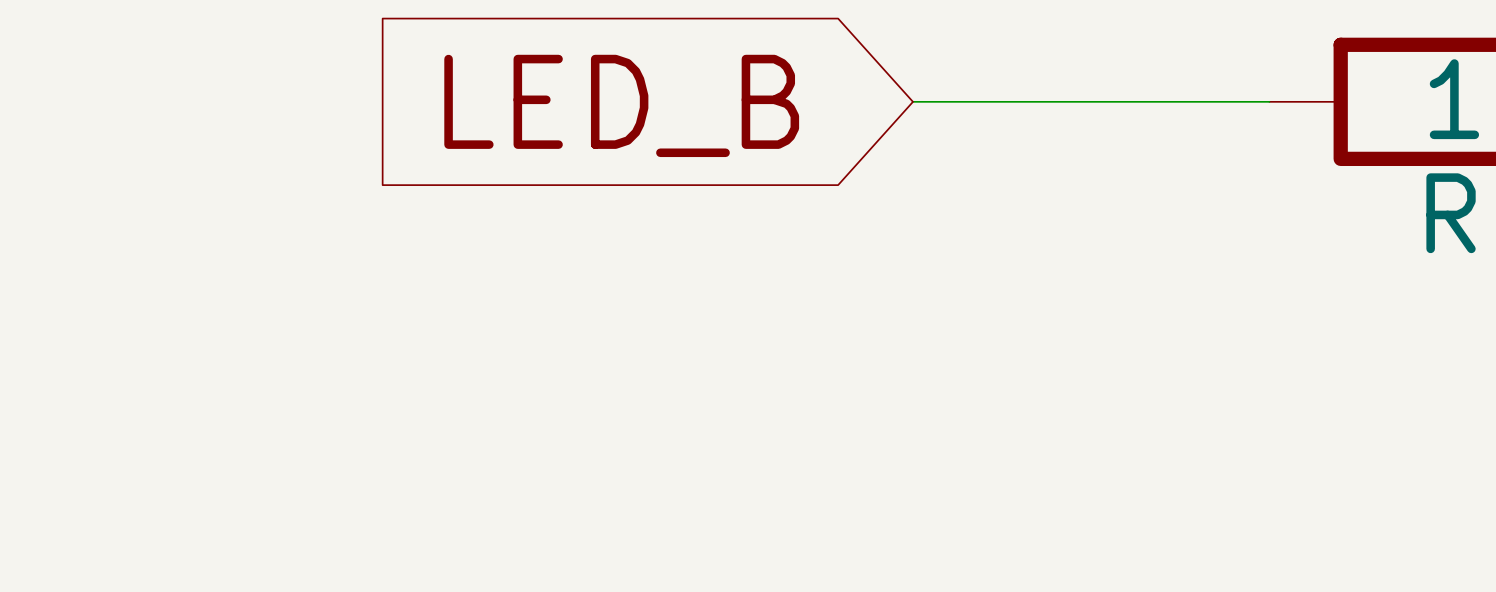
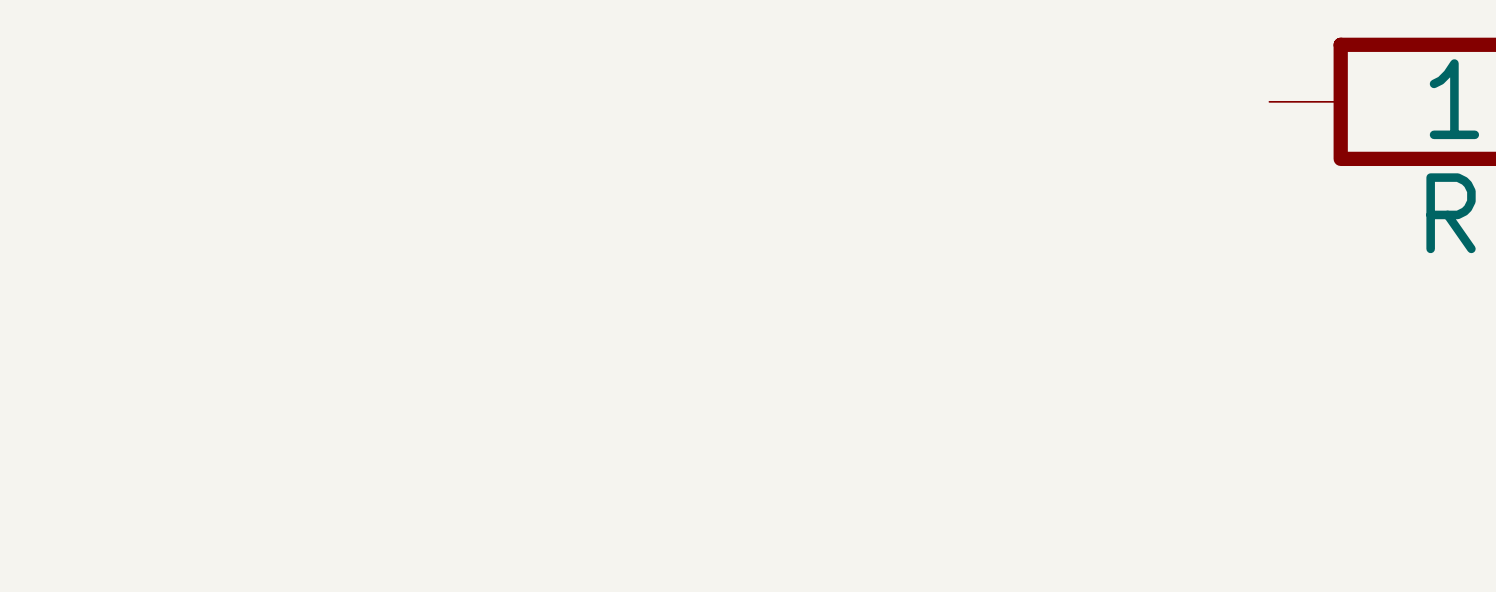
wire: (912, 101) (1269, 101) -> none
global label: LED_B (621, 105) -> none

